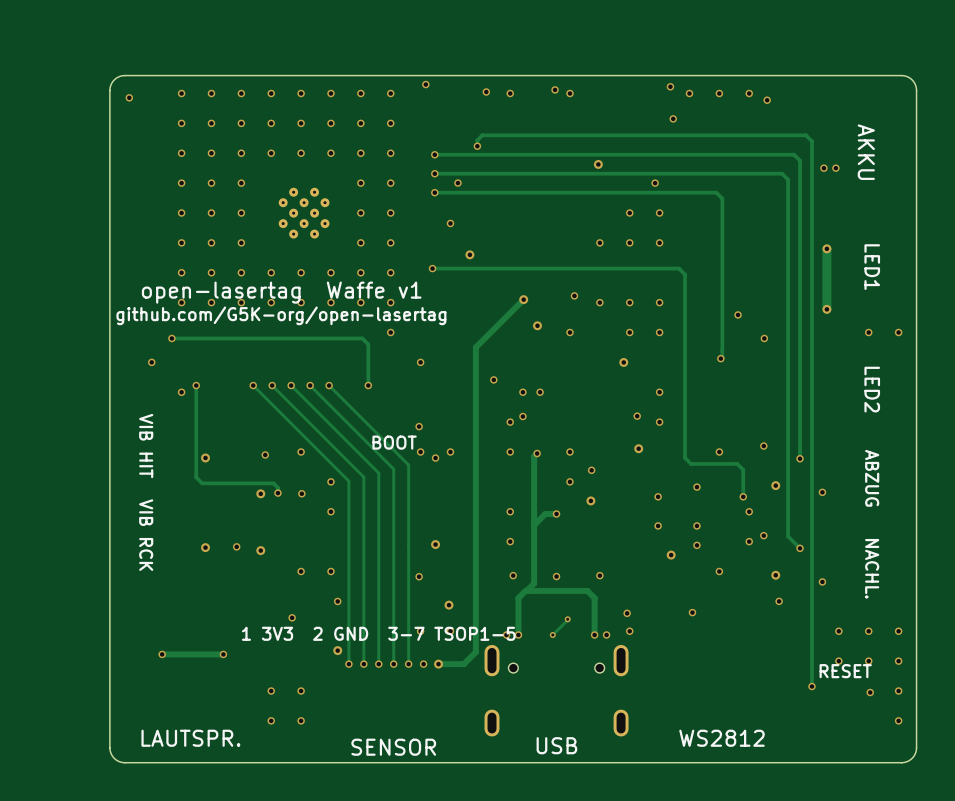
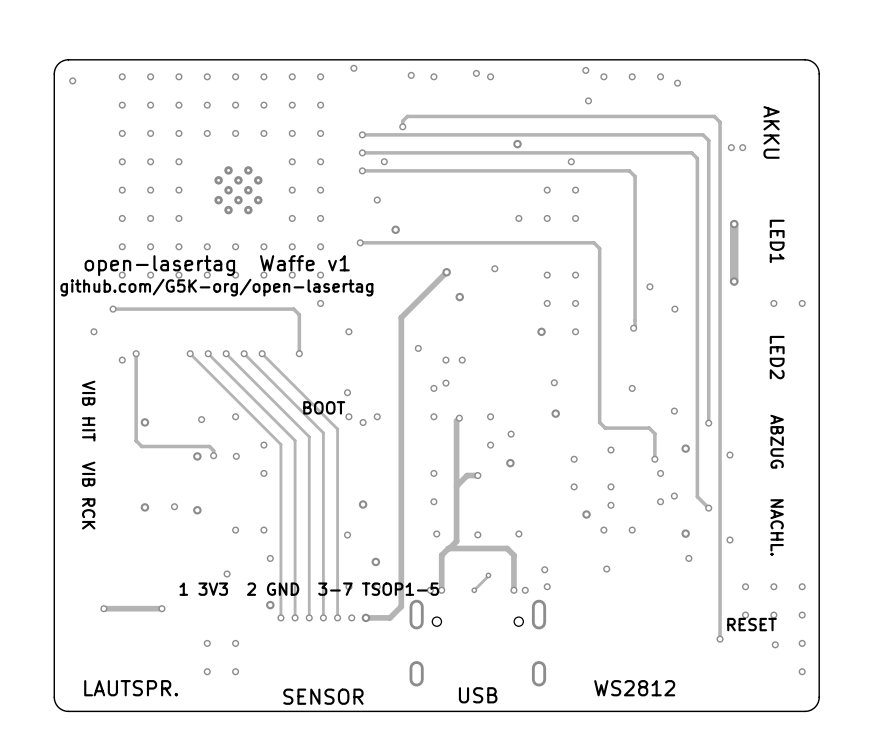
via: (599, 302) -> none
via: (569, 332) -> none
via: none -> (575, 331)
via: (659, 392) -> none
via: (659, 422) -> none
via: none -> (632, 388)
via: (719, 452) -> none
via: none -> (603, 530)

